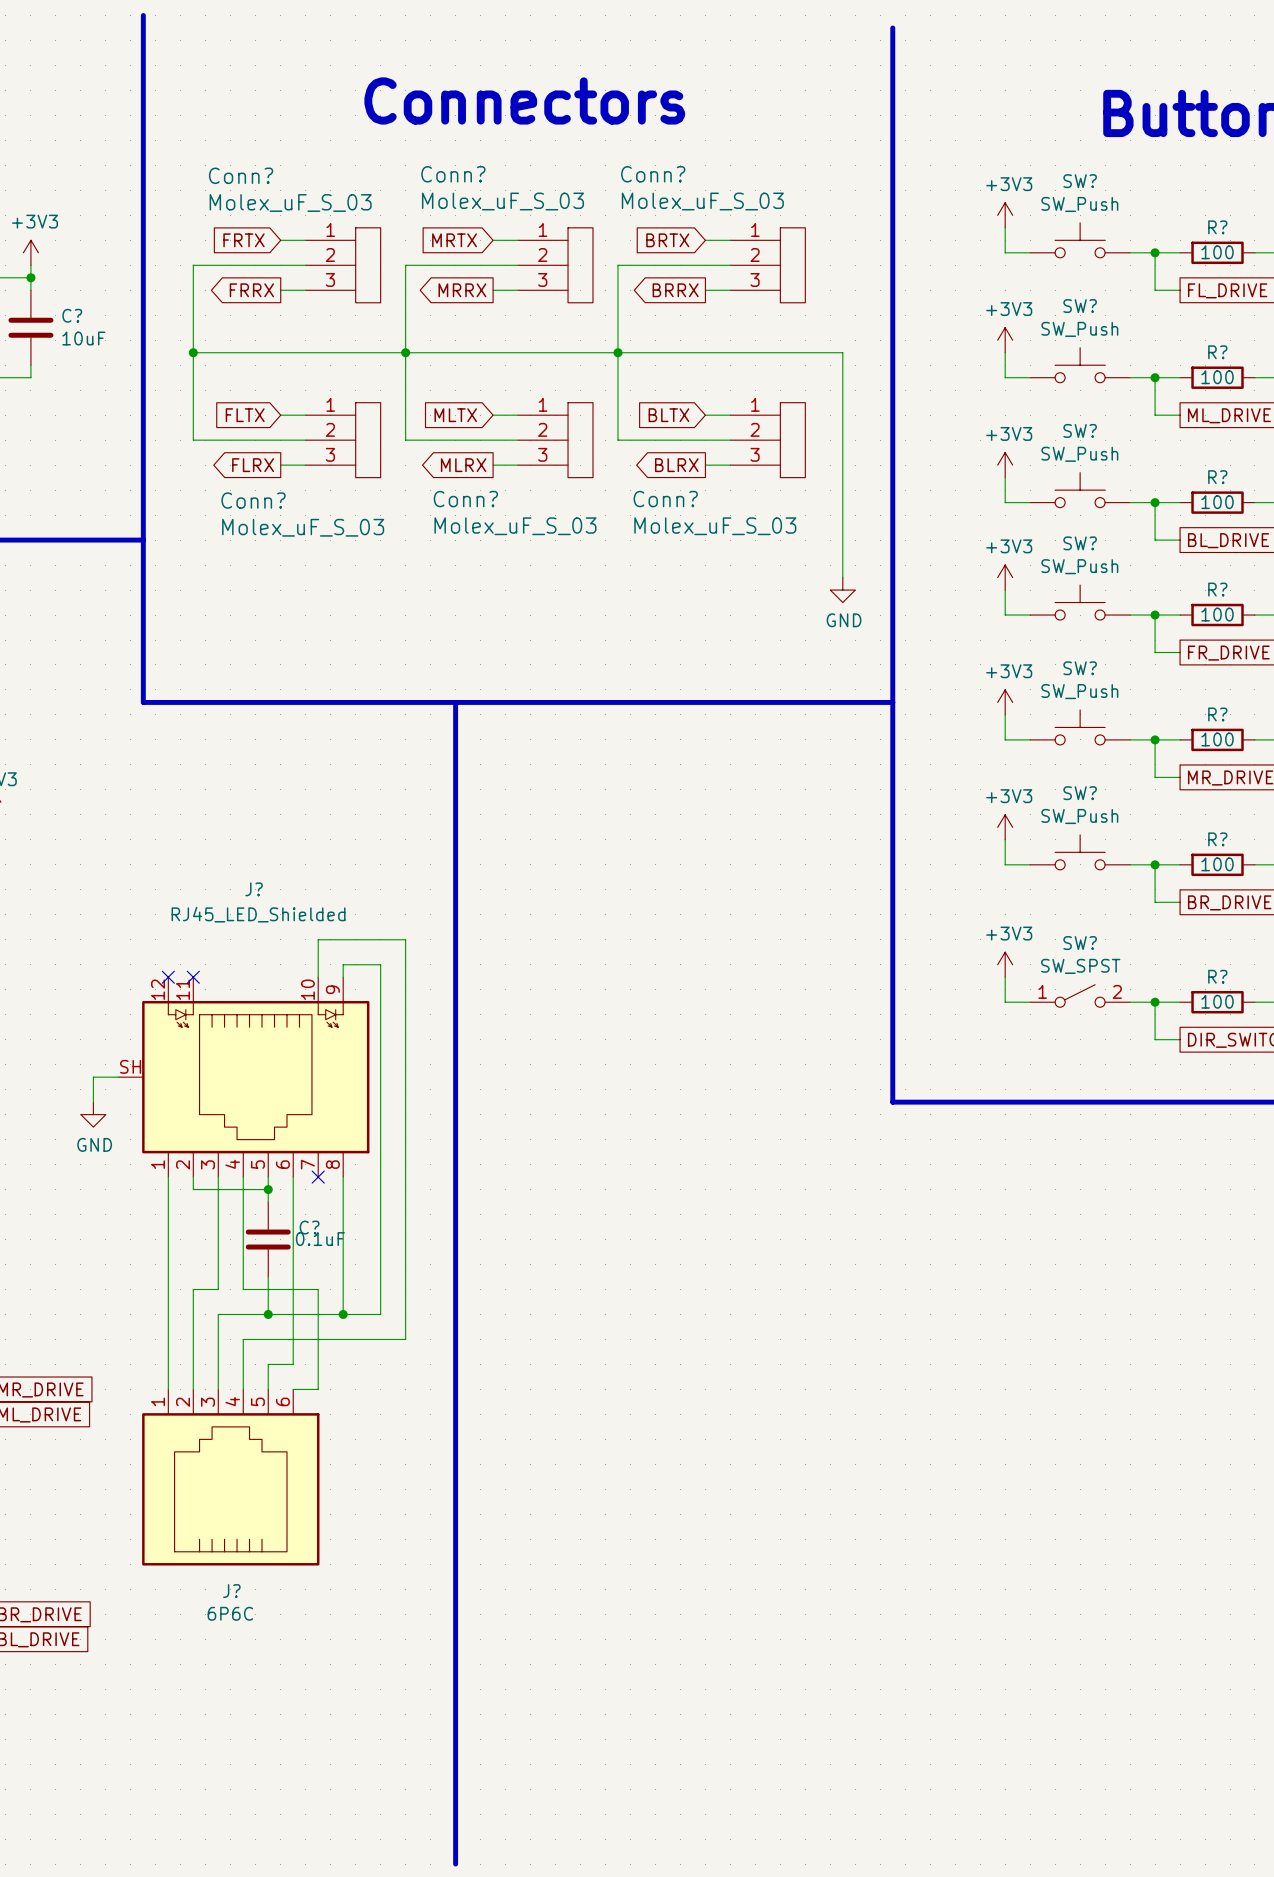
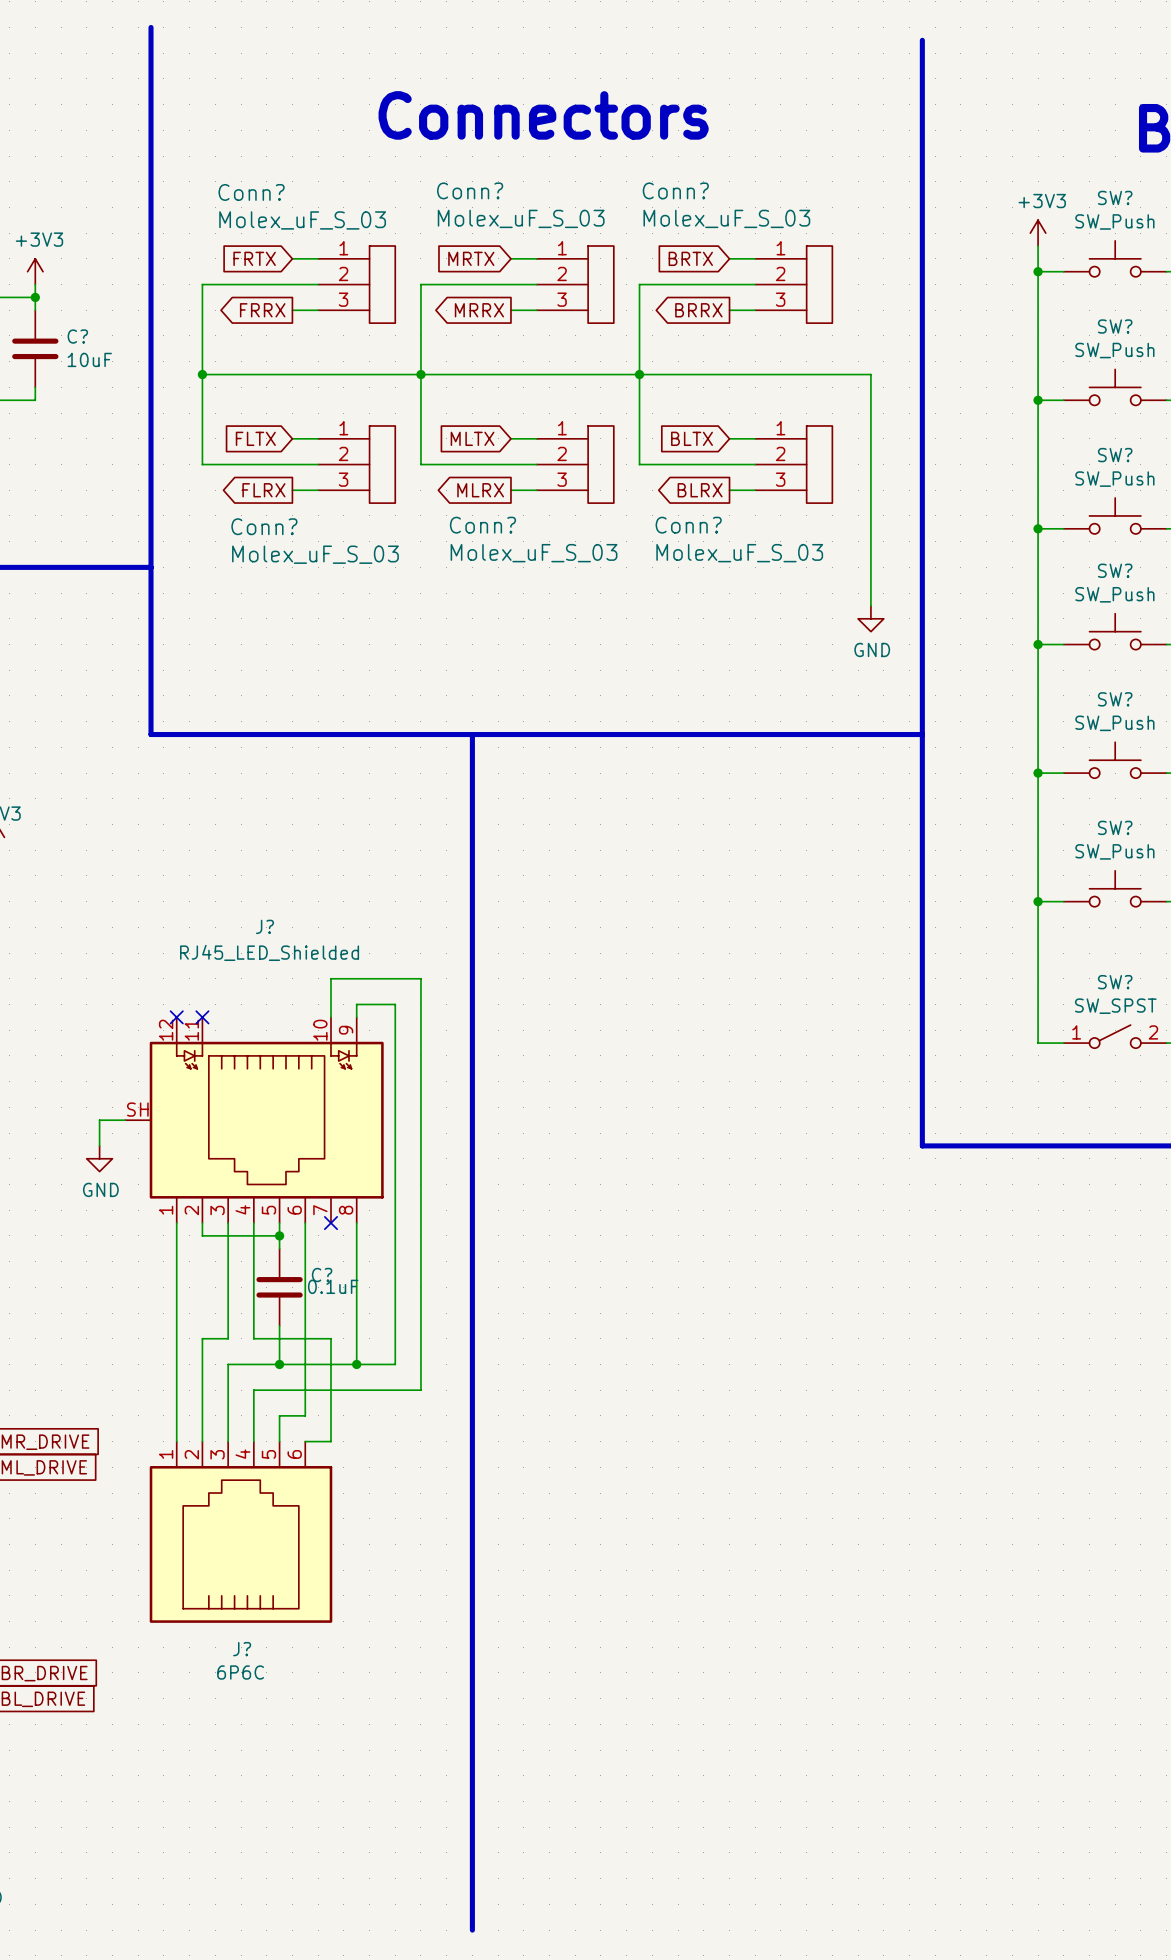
wire: none -> (1038, 271) (1038, 374)
junction: none -> (1038, 271)
power symbol: +3V3 (1005, 340) -> none
wire: none -> (1038, 400) (1038, 503)
junction: none -> (1038, 400)
power symbol: +3V3 (1005, 465) -> none
wire: none -> (1038, 528) (1038, 618)
junction: none -> (1038, 528)
power symbol: +3V3 (1005, 577) -> none
wire: none -> (1038, 644) (1038, 747)
junction: none -> (1038, 644)
power symbol: +3V3 (1005, 702) -> none
wire: none -> (1038, 773) (1038, 875)
junction: none -> (1038, 773)
power symbol: +3V3 (1005, 827) -> none
wire: none -> (1038, 901) (1038, 1017)
junction: none -> (1038, 901)
power symbol: +3V3 (1005, 964) -> none

